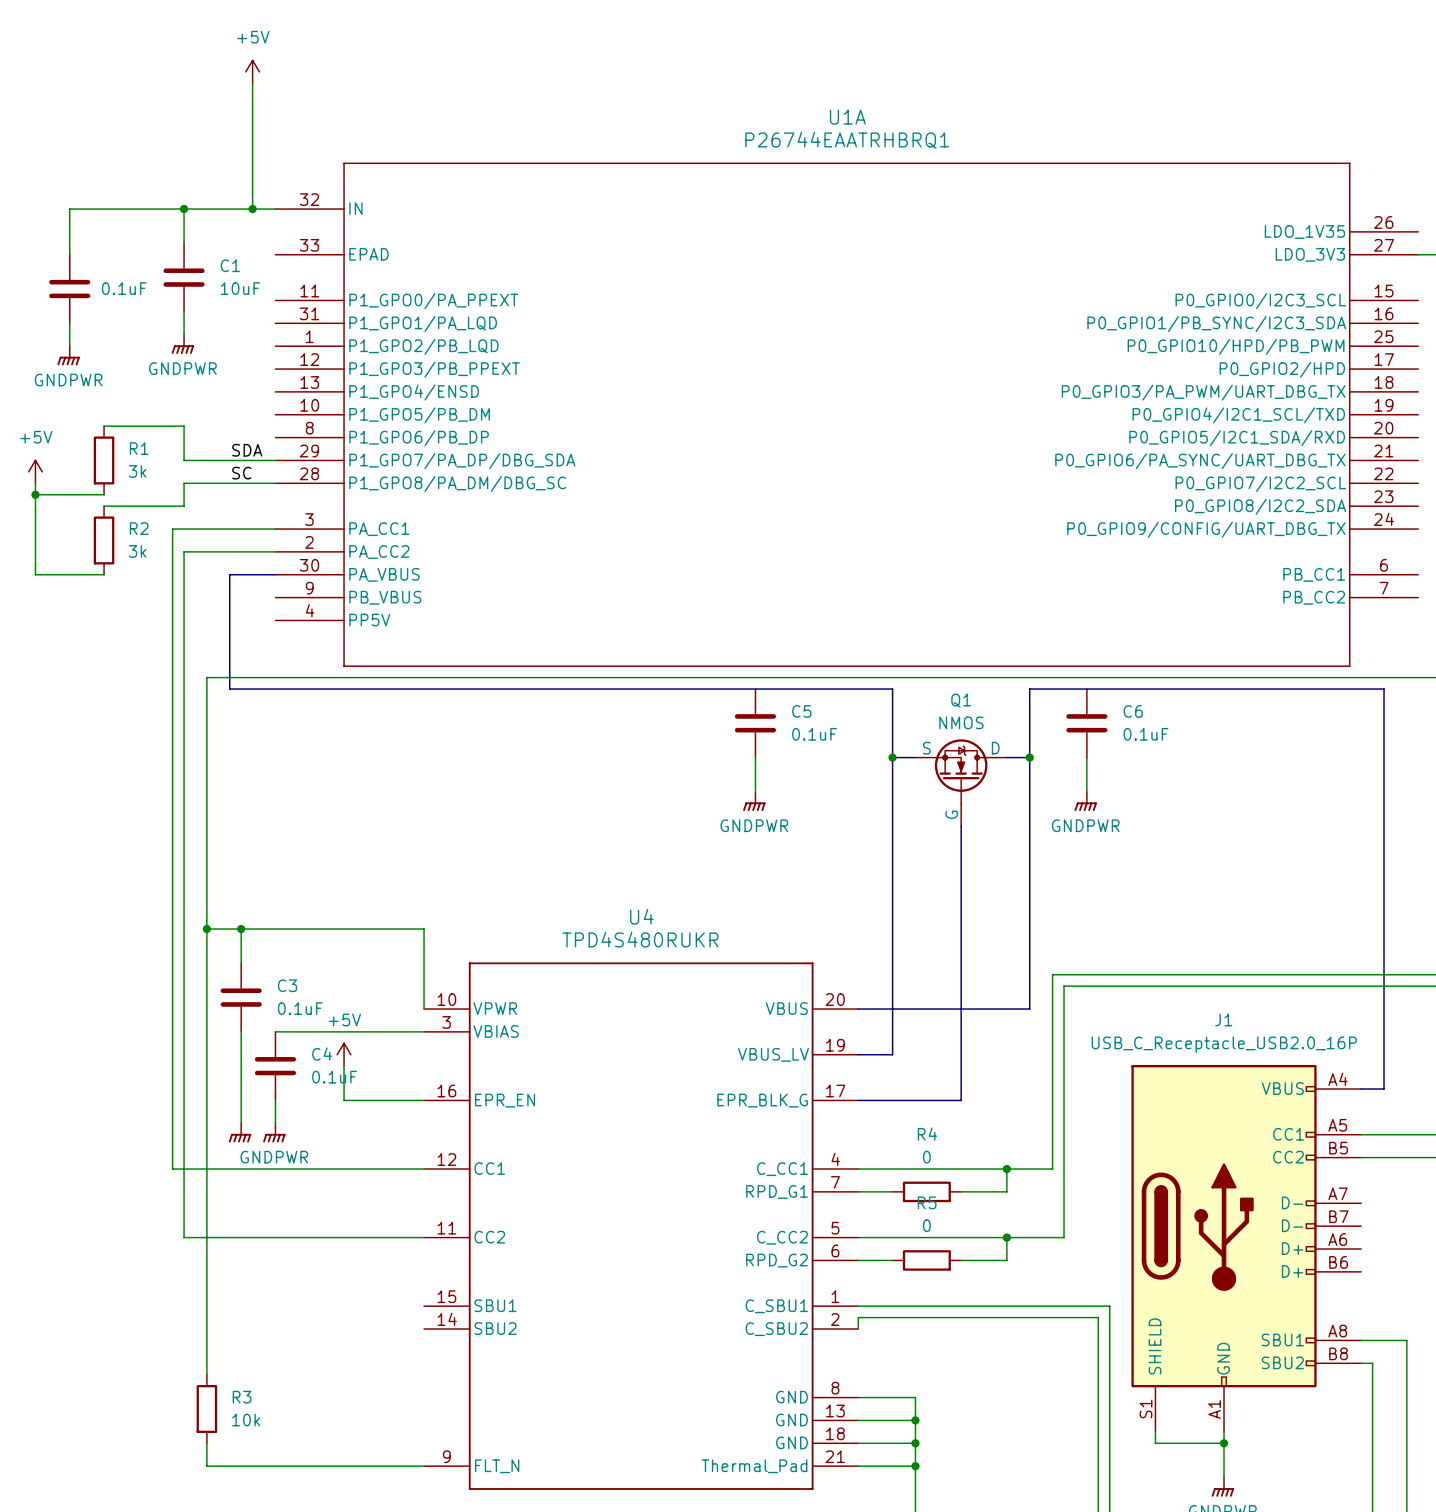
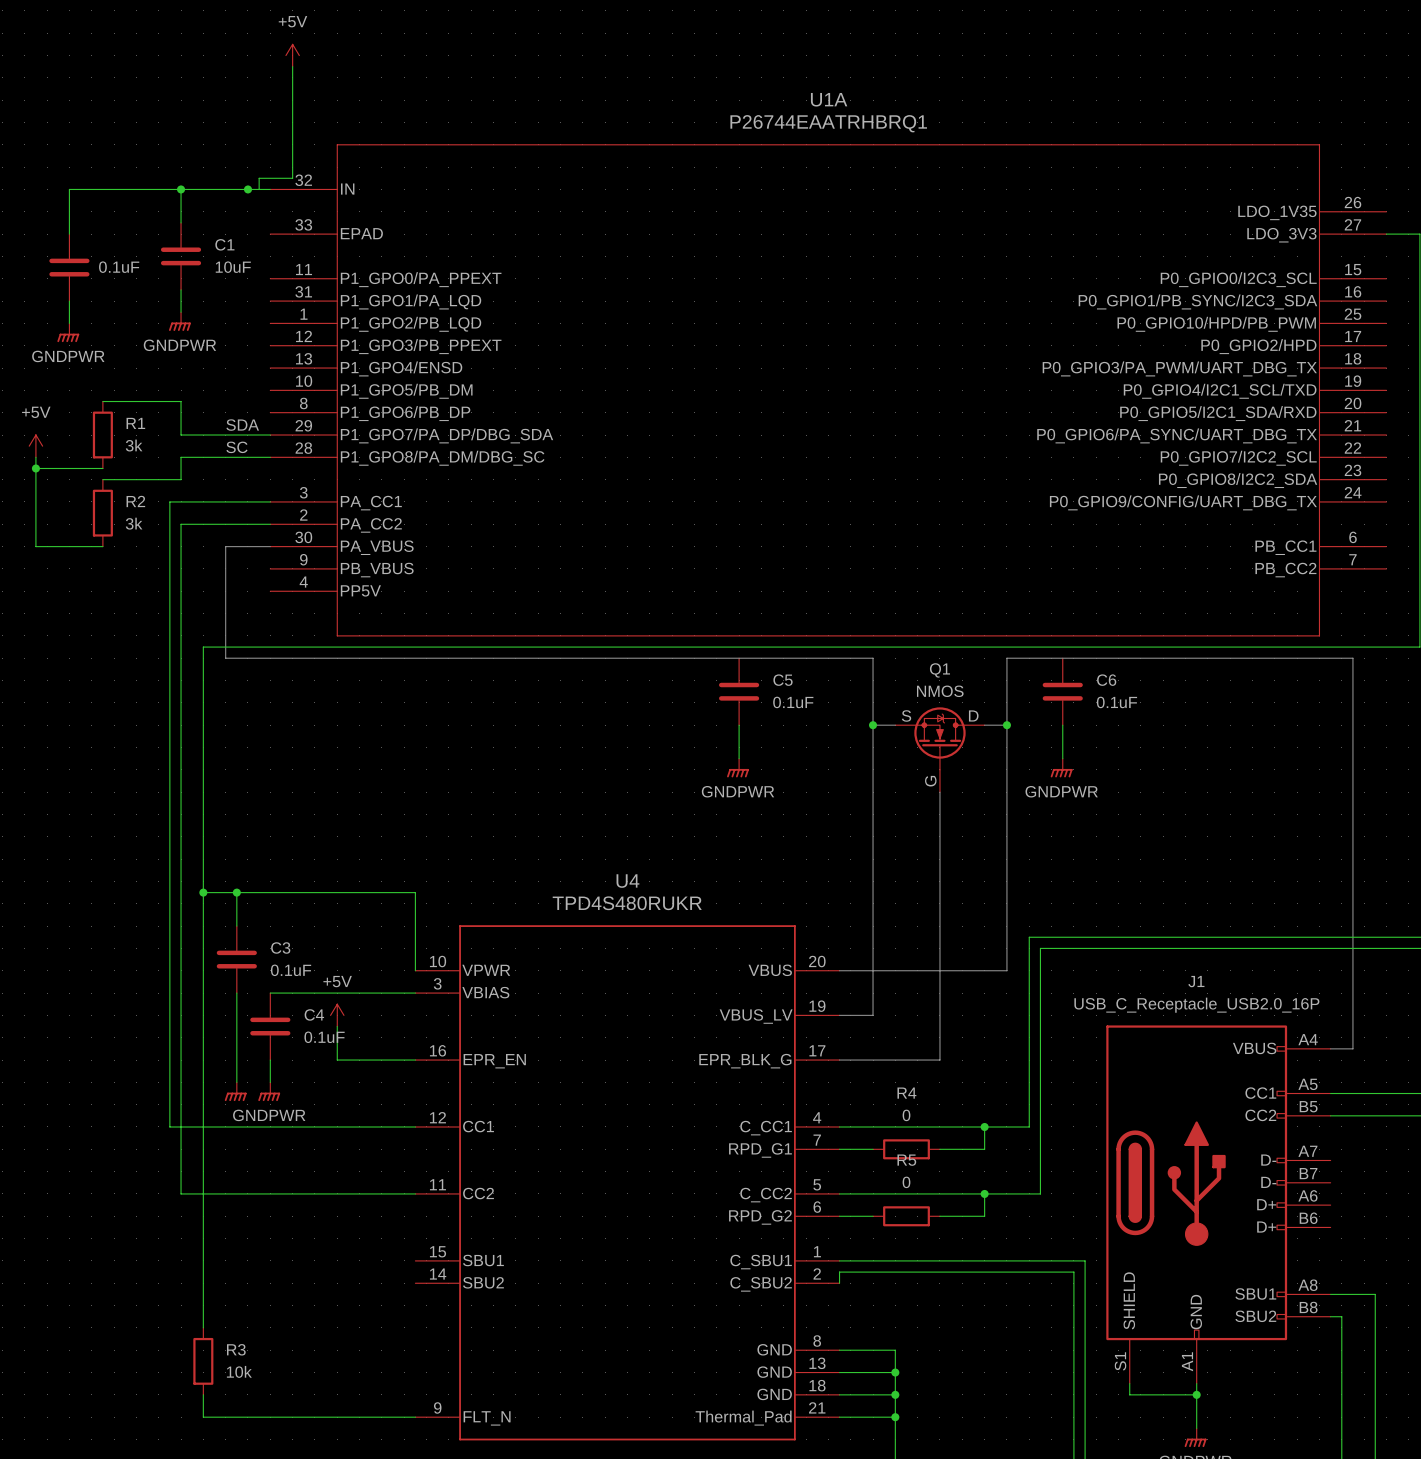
power symbol position: +5V (252, 71) -> +5V (292, 55)
wire: (252, 83) (252, 209) -> none
wire: none -> (292, 66) (292, 178) (259, 178) (259, 189)

